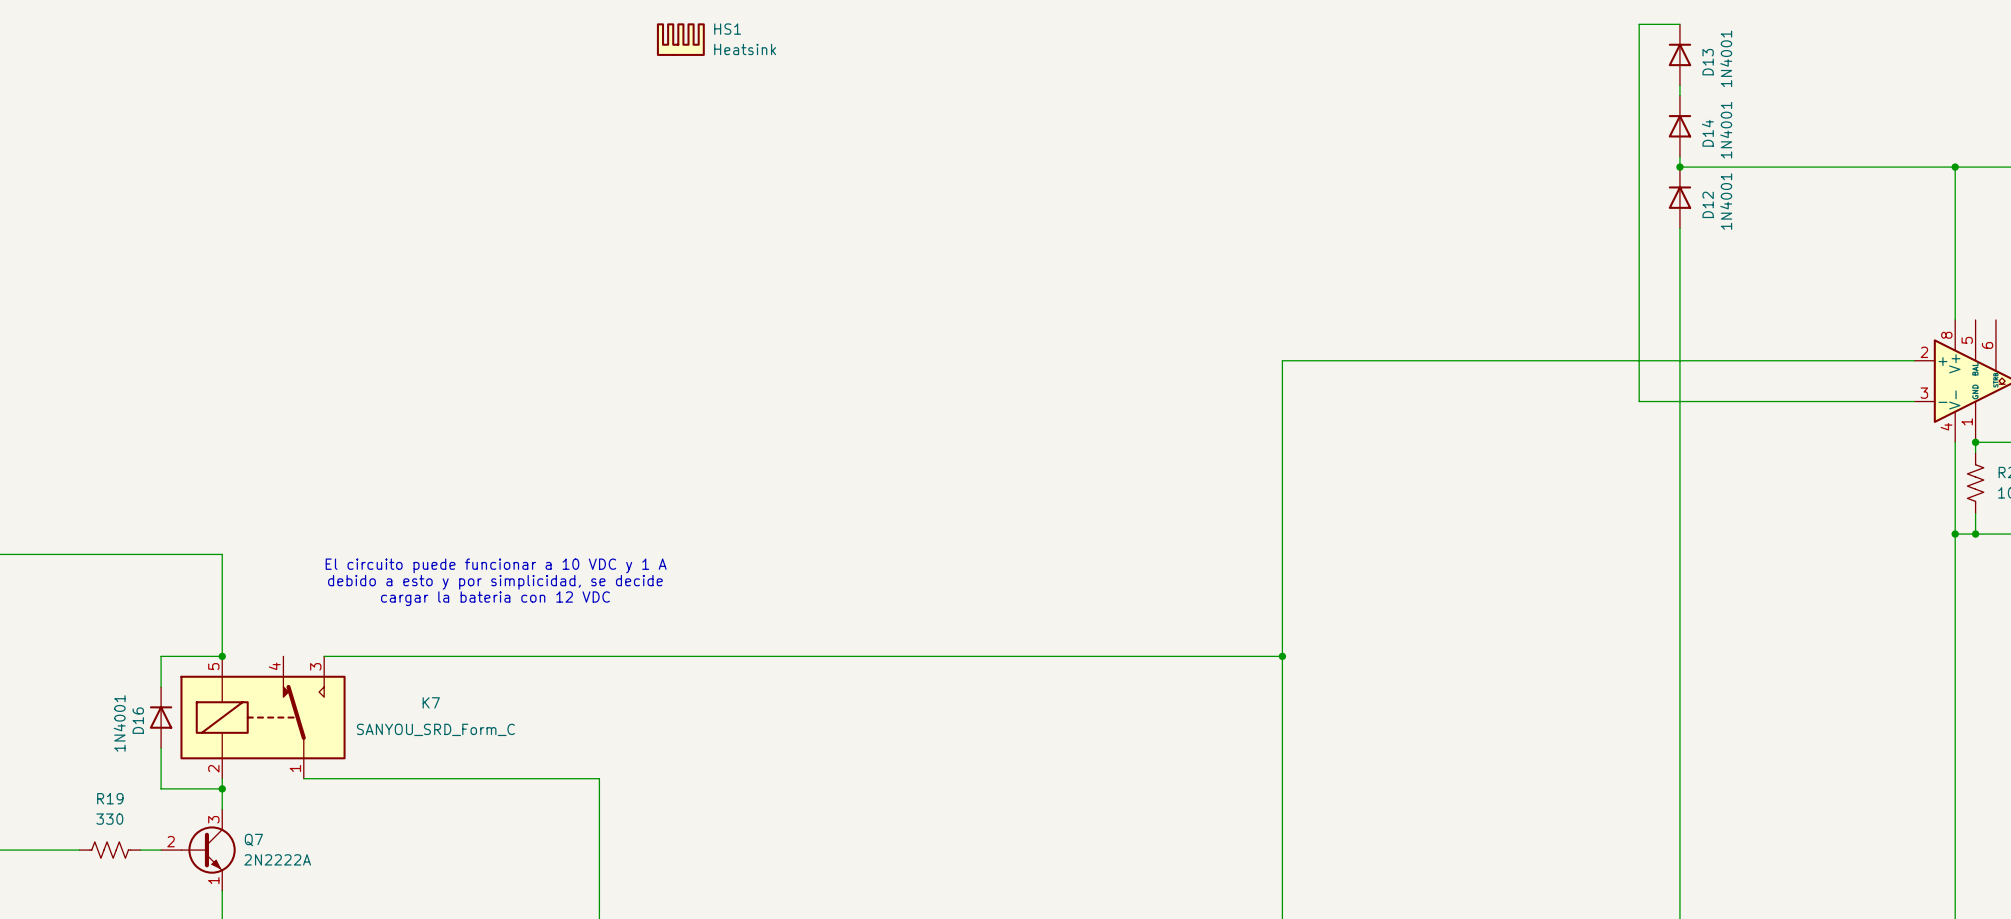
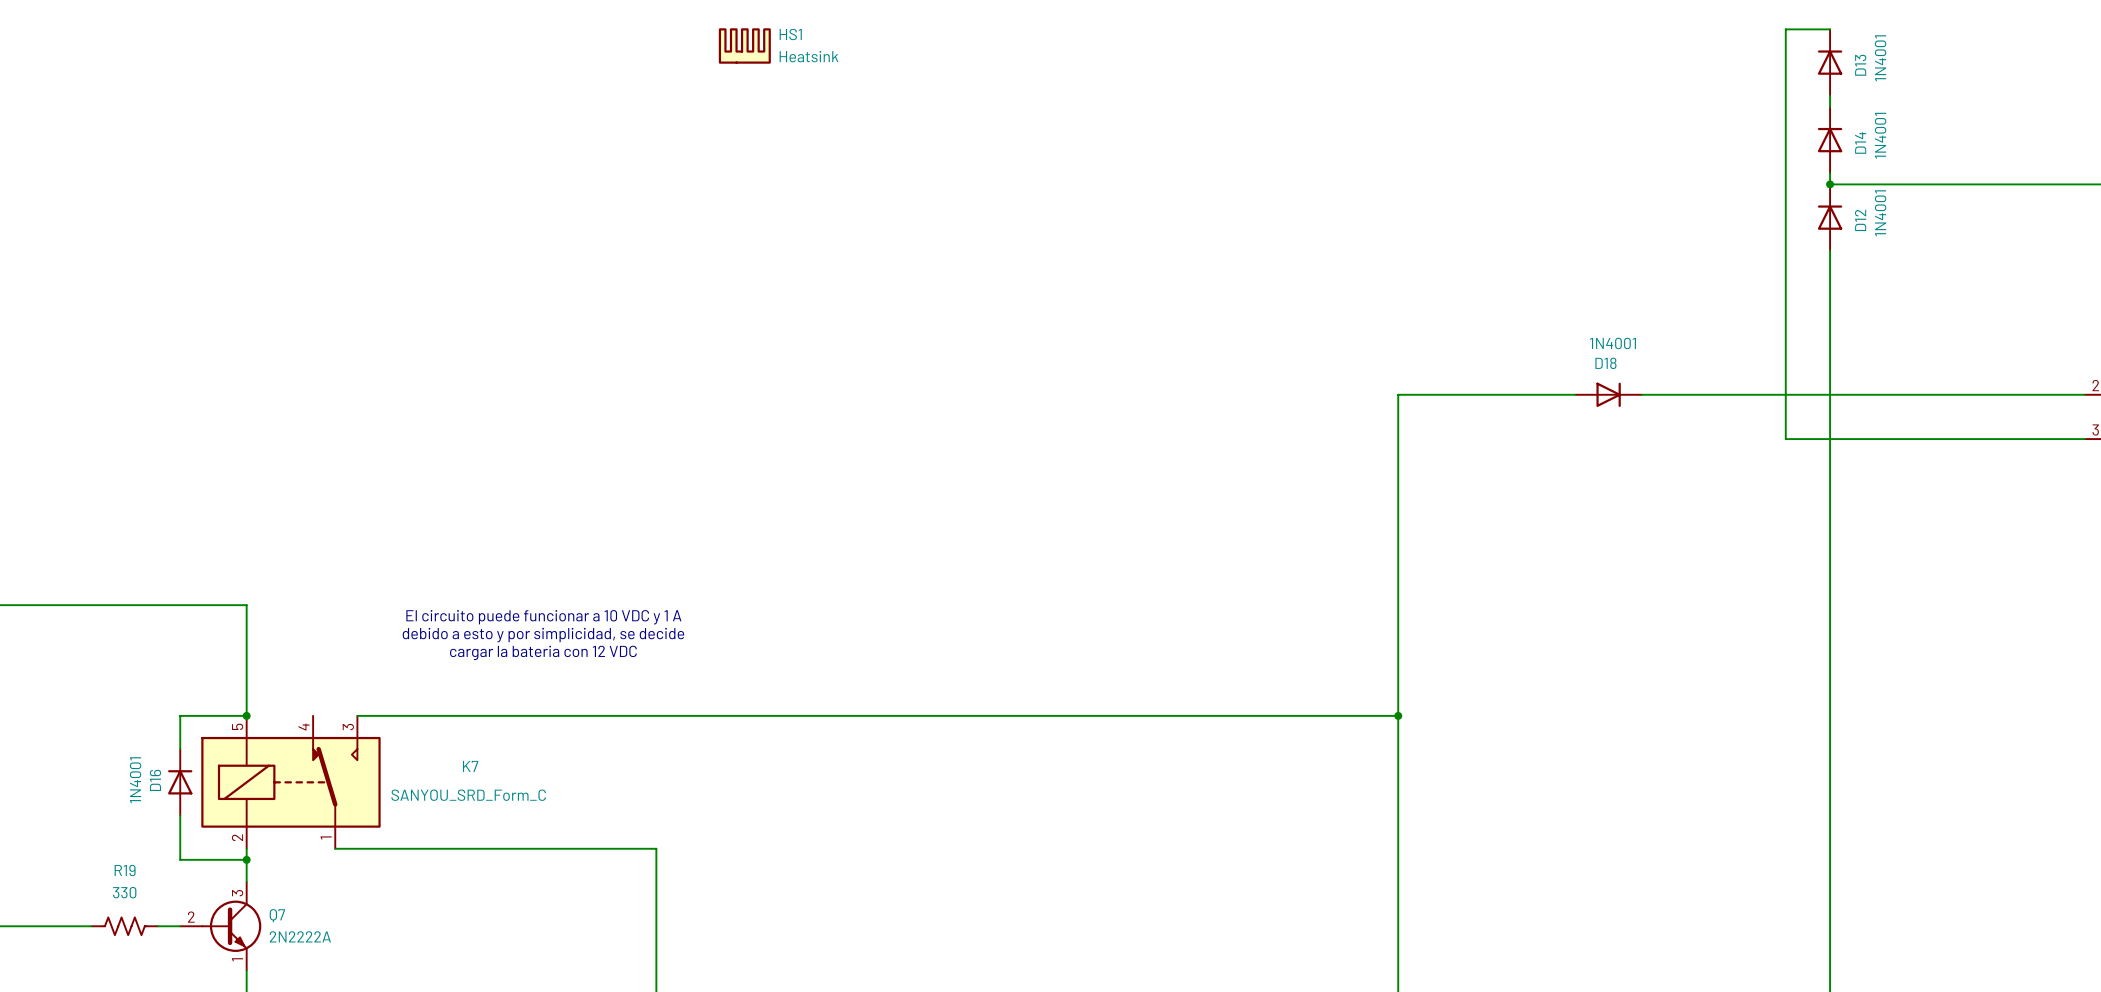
D18: none -> 1N4001 (1608, 394)

